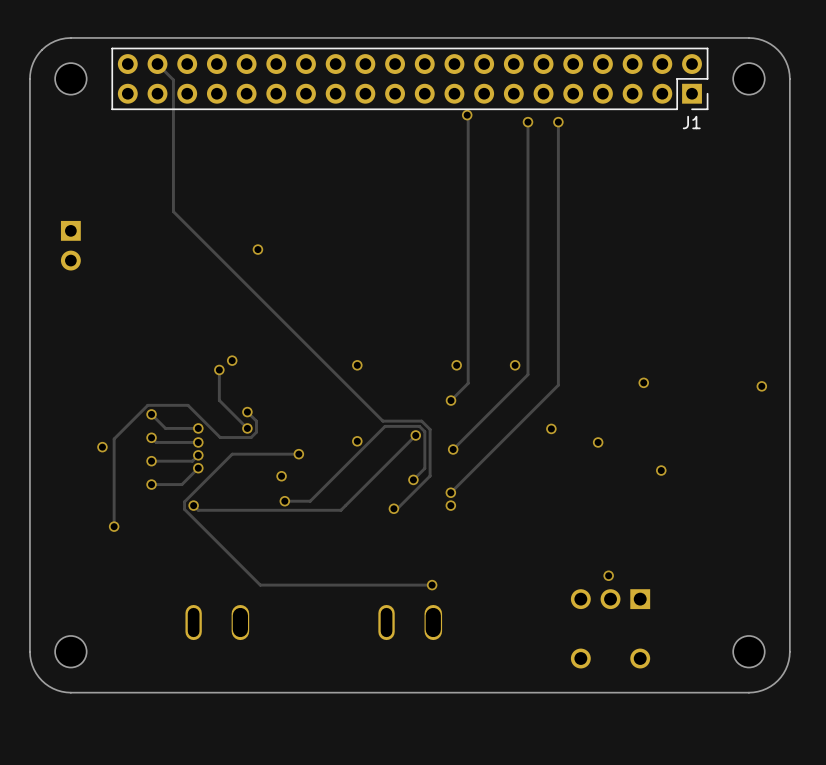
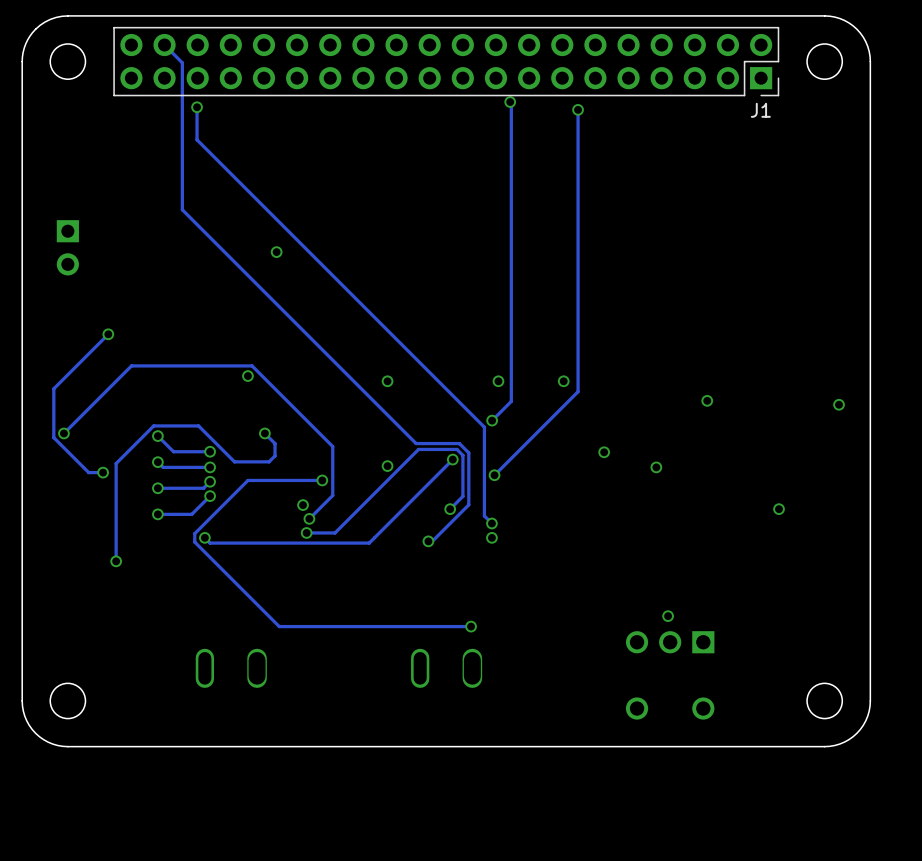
via: none -> (197, 107)
track: (558, 122) (558, 385) (450, 492) -> (197, 107) (197, 139) (484, 427) (484, 515) (491, 523)
via: (558, 122) -> none
track: none -> (108, 334) (53, 388) (53, 437) (88, 472) (103, 472)
via: none -> (108, 334)
track: (219, 369) (219, 400) (247, 428) -> none
via: (219, 369) -> none
track: none -> (63, 433) (131, 365) (252, 365) (332, 446) (332, 495) (309, 518)
via: none -> (63, 433)
via: (247, 428) -> none
via position: (661, 470) -> (779, 509)
via: none -> (309, 518)

